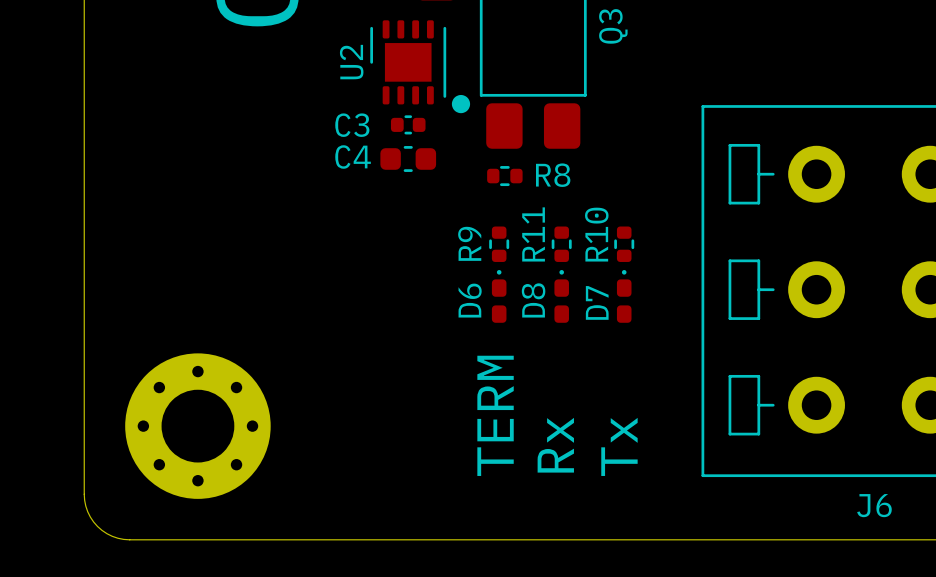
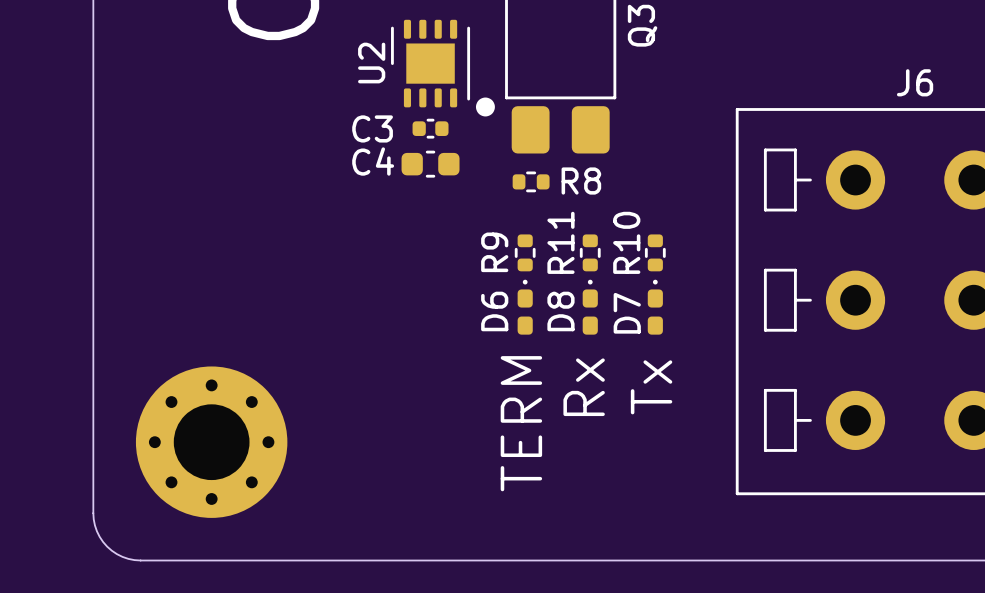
text position: Rx (555, 445) -> Rx (584, 387)
text position: Tx (619, 446) -> Tx (651, 387)
J6 name position: J6 (874, 505) -> J6 (915, 82)

